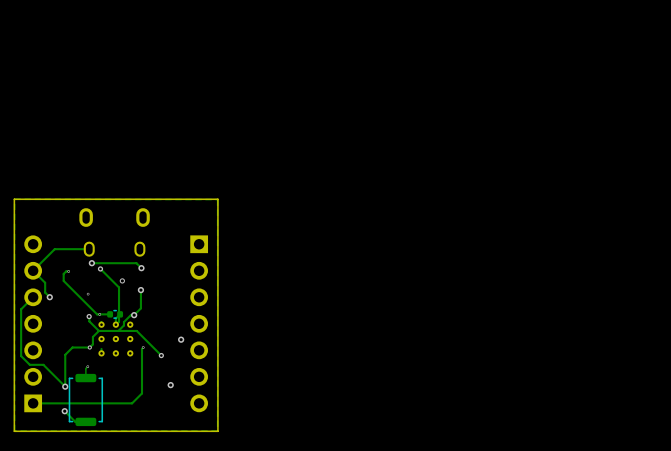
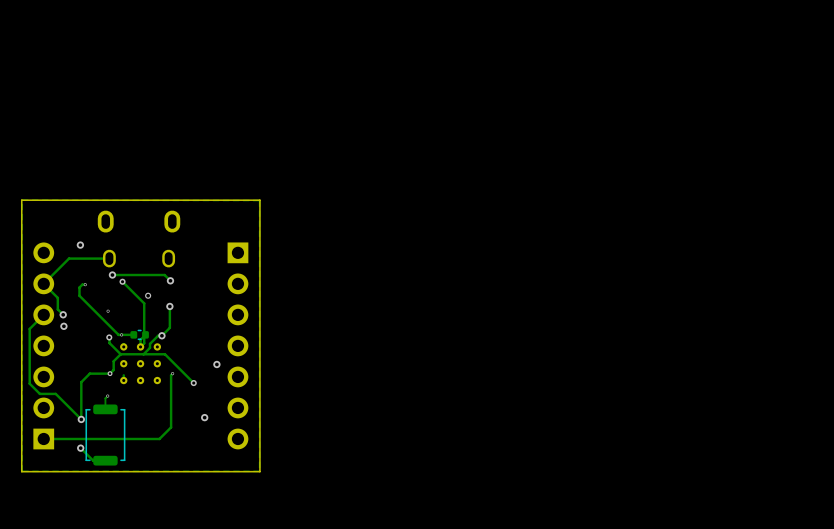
via: none -> (80, 245)
via: none -> (63, 326)

